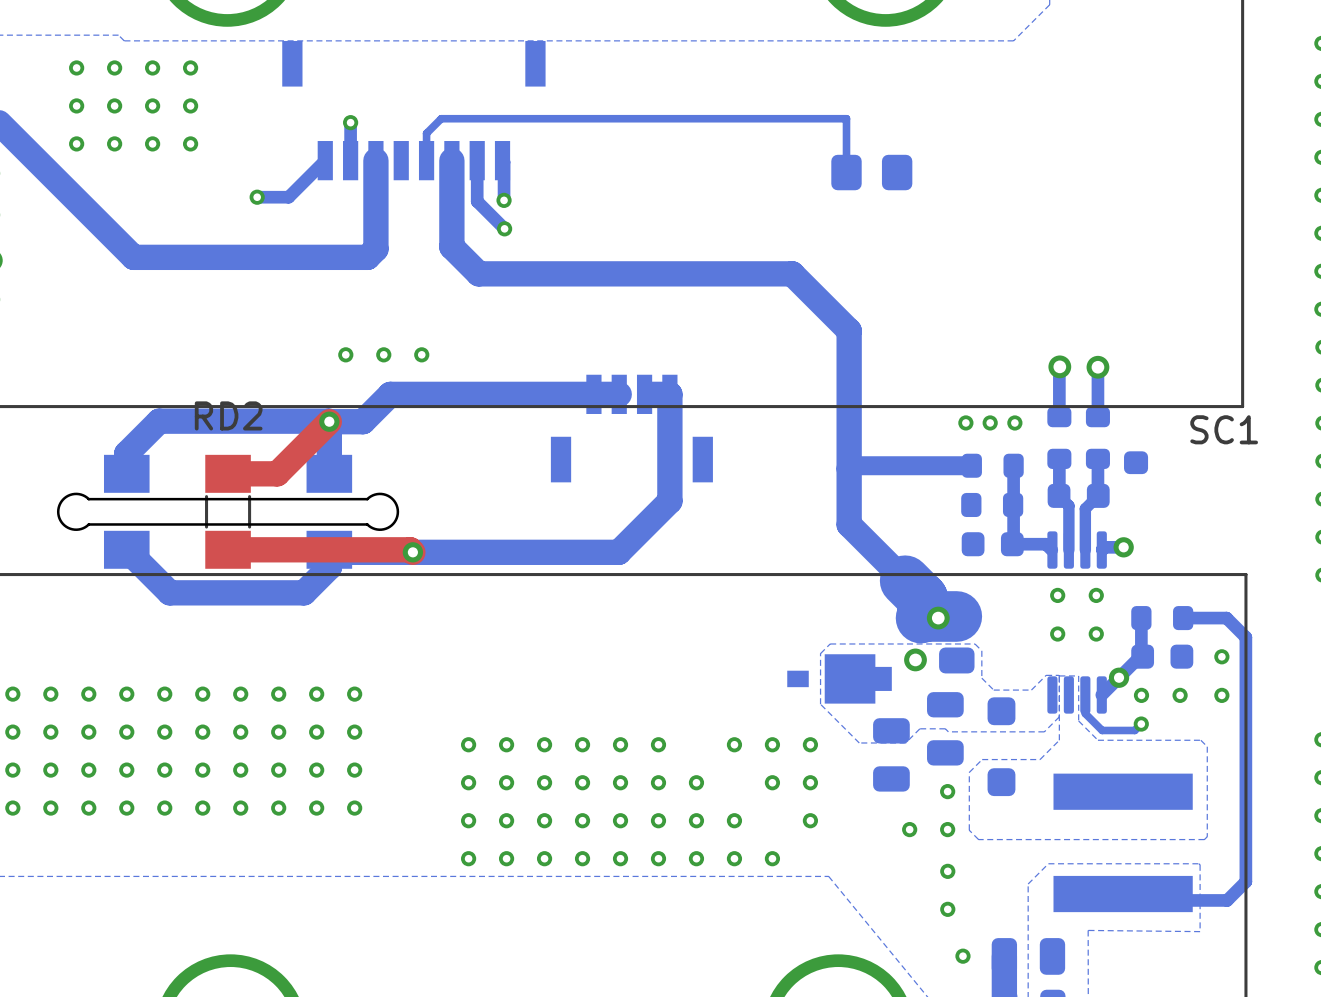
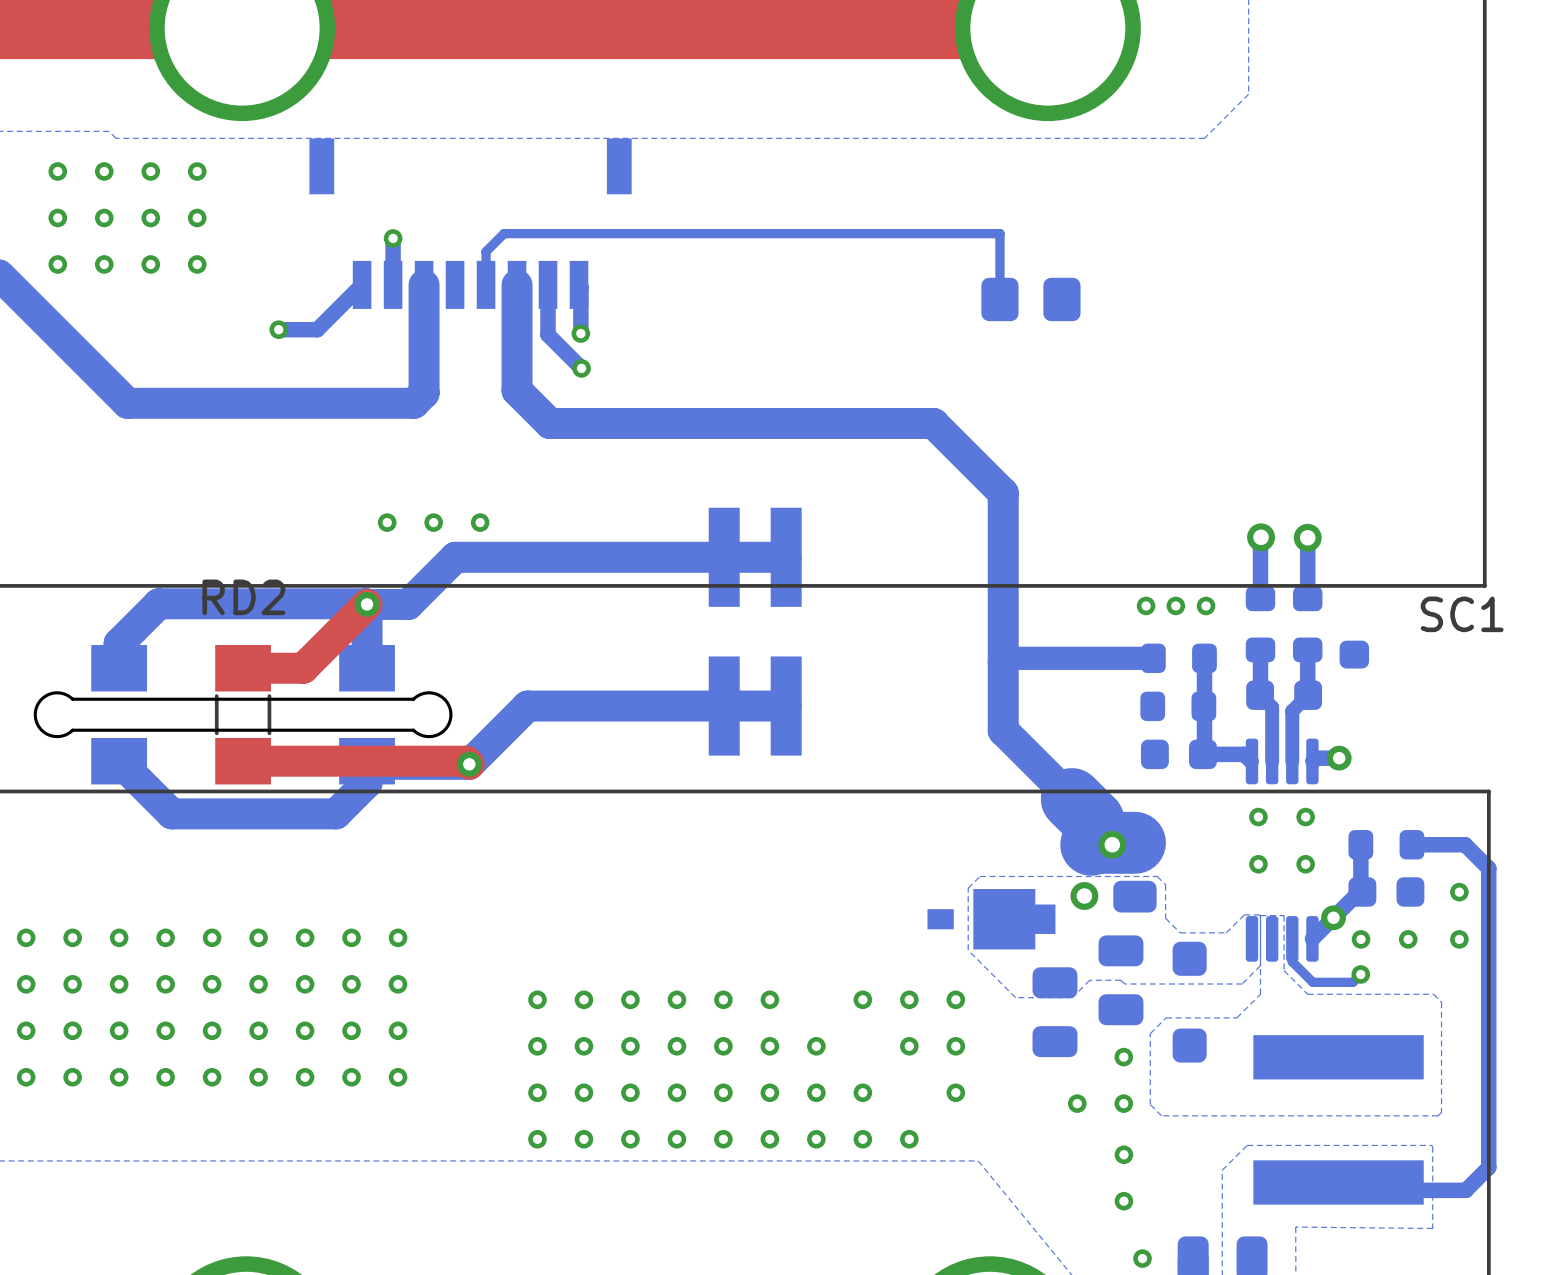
part footprint: [550, 374, 713, 483] -> [708, 507, 802, 756]
bottom track: (390, 394) (619, 394) -> (441, 570) (455, 557) (786, 557)
bottom track: (649, 394) (669, 394) (669, 501) (618, 552) (412, 552) -> (786, 706) (527, 706) (469, 764)

